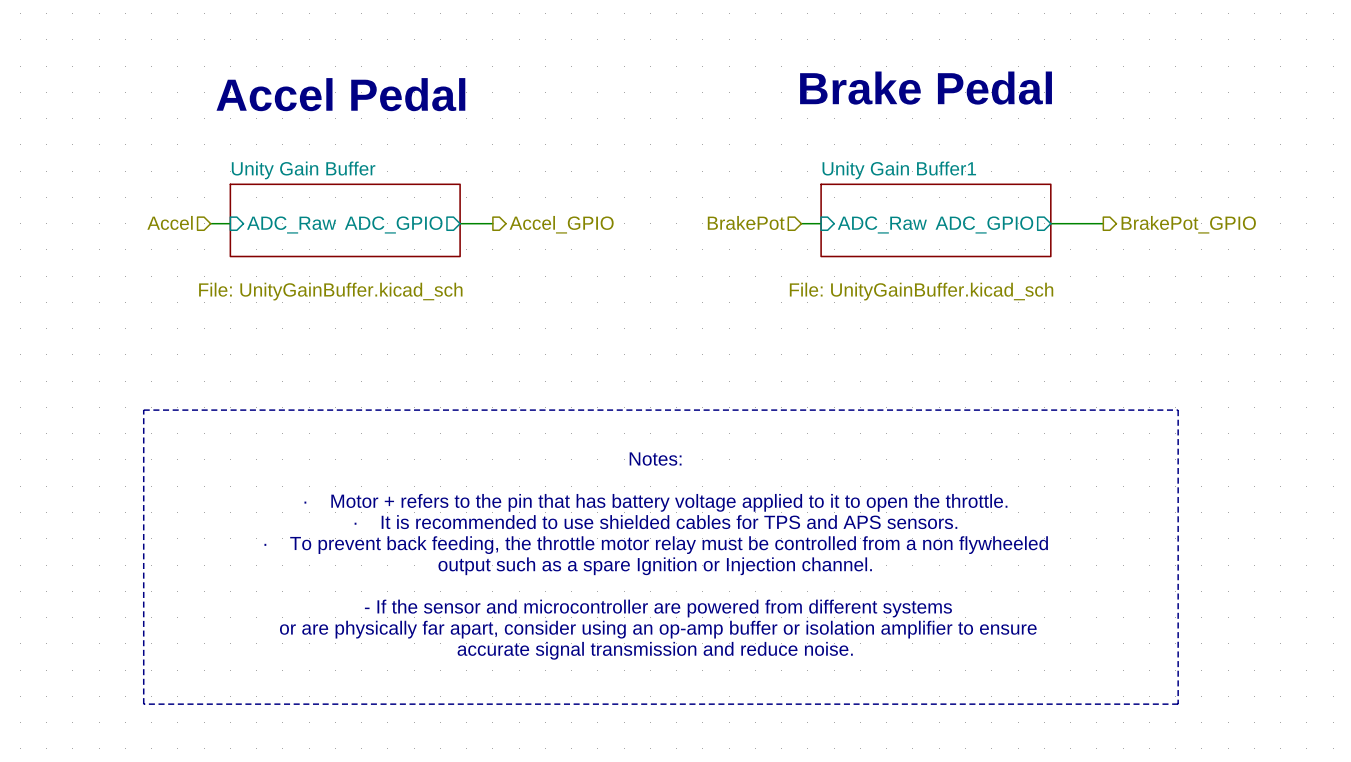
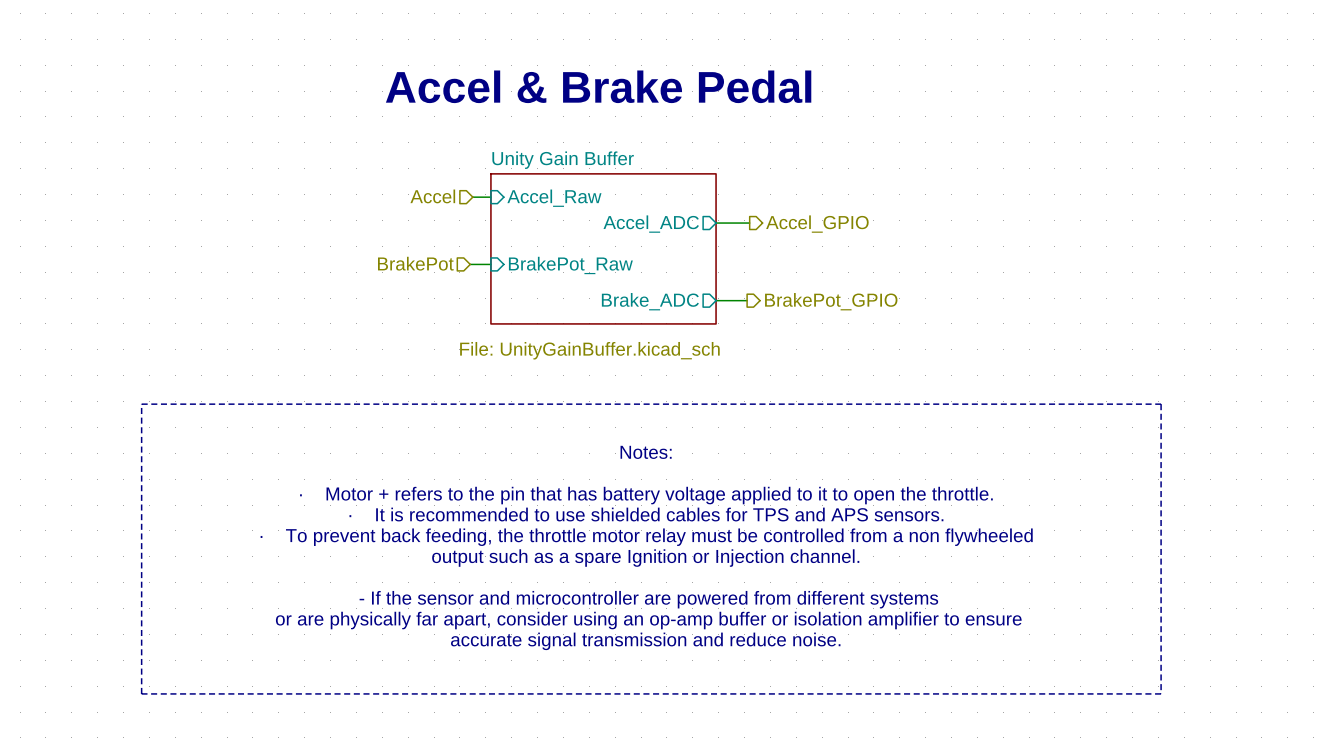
text: none -> Accel & Brake Pedal (598, 86)
text: Brake Pedal (926, 88) -> none
text: Accel Pedal (340, 94) -> none
hierarchical label: none -> Accel (432, 196)
wire: none -> (472, 197) (490, 197)
sheet pin: none -> Accel_Raw (554, 198)
sheet Unity Gain Buffer: File: UnityGainBuffer.kicad_sch (345, 220) -> none
sheet Unity Gain Buffer1: File: UnityGainBuffer.kicad_sch (935, 220) -> none
hierarchical label: Accel (170, 222) -> none
hierarchical label shape: input (746, 222) -> output (817, 224)
hierarchical label: BrakePot (746, 222) -> Accel_GPIO (817, 224)
wire: (210, 223) (230, 223) -> none
wire: (460, 223) (492, 223) -> none
wire: (801, 223) (821, 223) -> none
wire: (1050, 223) (1103, 223) -> none
hierarchical label: Accel_GPIO (561, 224) -> none
hierarchical label: BrakePot_GPIO (1188, 224) -> none
sheet pin: ADC_Raw (291, 225) -> none
sheet pin: ADC_GPIO (393, 225) -> none
sheet pin: ADC_Raw (882, 225) -> none
sheet pin: ADC_GPIO (984, 225) -> none
wire: none -> (716, 223) (749, 223)
sheet pin: none -> Accel_ADC (651, 224)
sheet Unity Gain Buffer: none -> File: UnityGainBuffer.kicad_sch (603, 248)
hierarchical label: none -> BrakePot (415, 263)
wire: none -> (470, 264) (490, 264)
sheet pin: none -> BrakePot_Raw (570, 265)
wire: none -> (716, 300) (747, 300)
sheet pin: none -> Brake_ADC (650, 301)
hierarchical label: none -> BrakePot_GPIO (831, 301)

